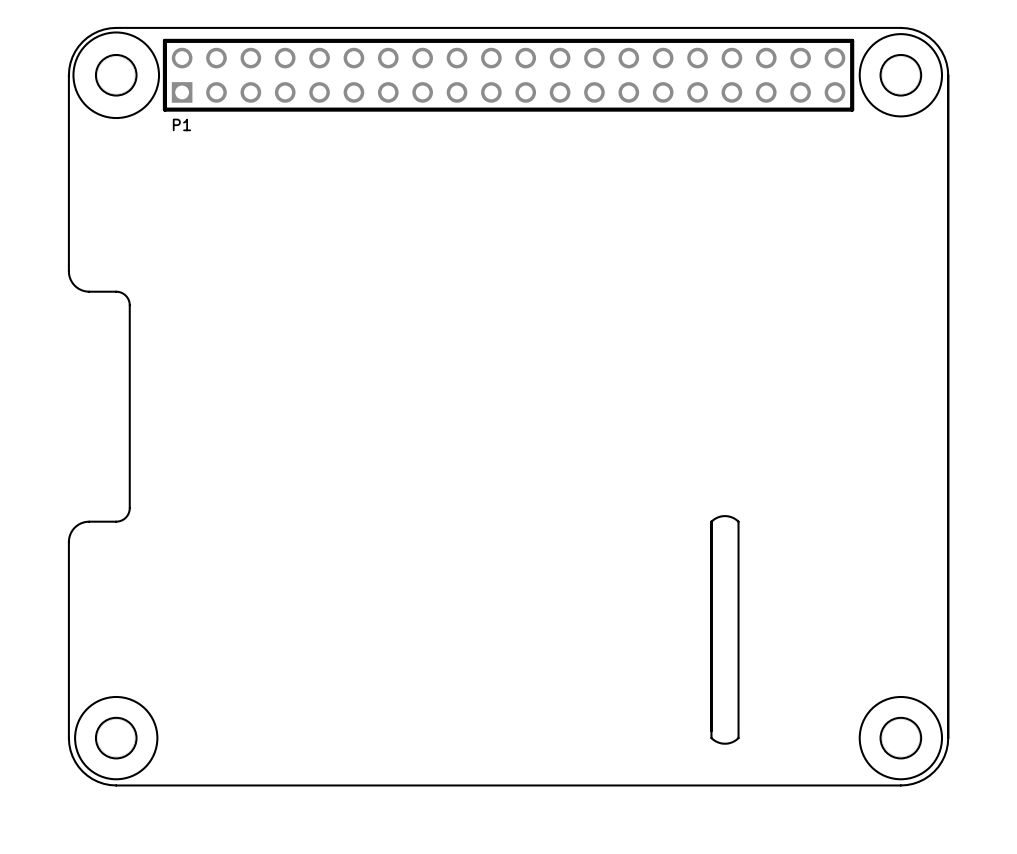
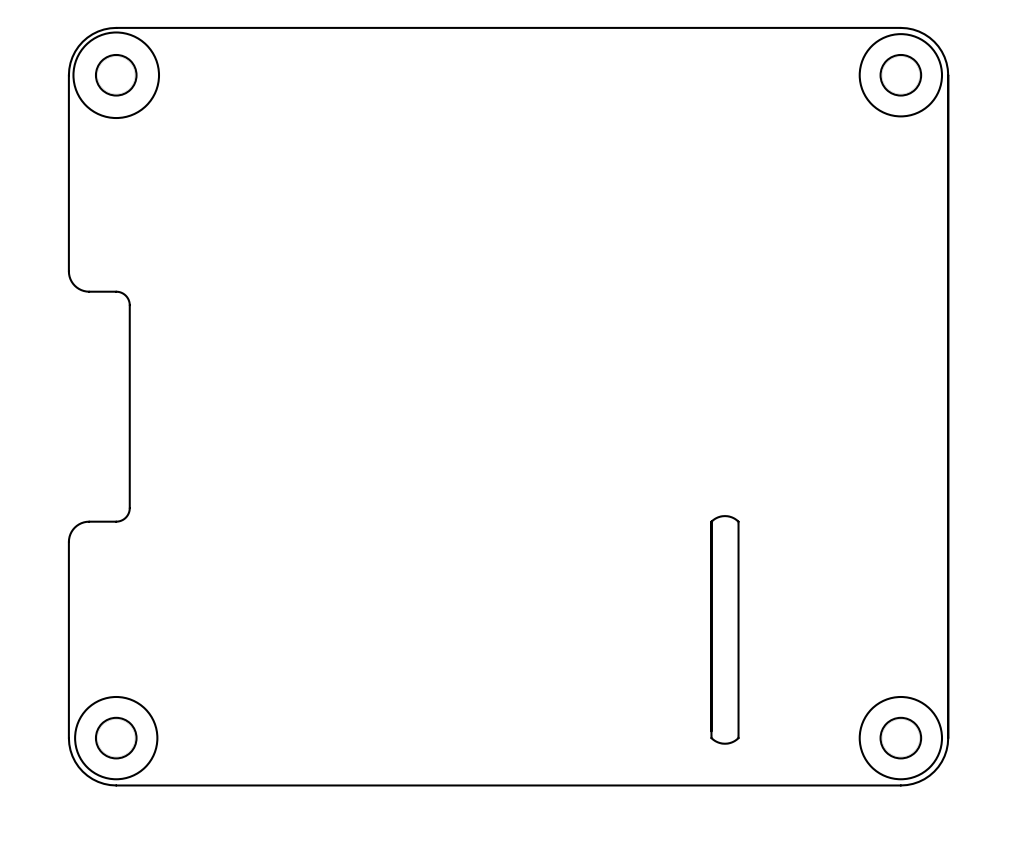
P1: (508, 75) -> none

